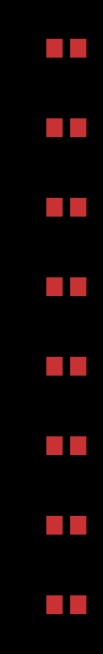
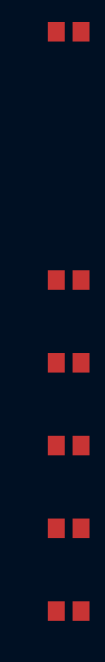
part: (66, 127) -> none
part: (66, 207) -> none

